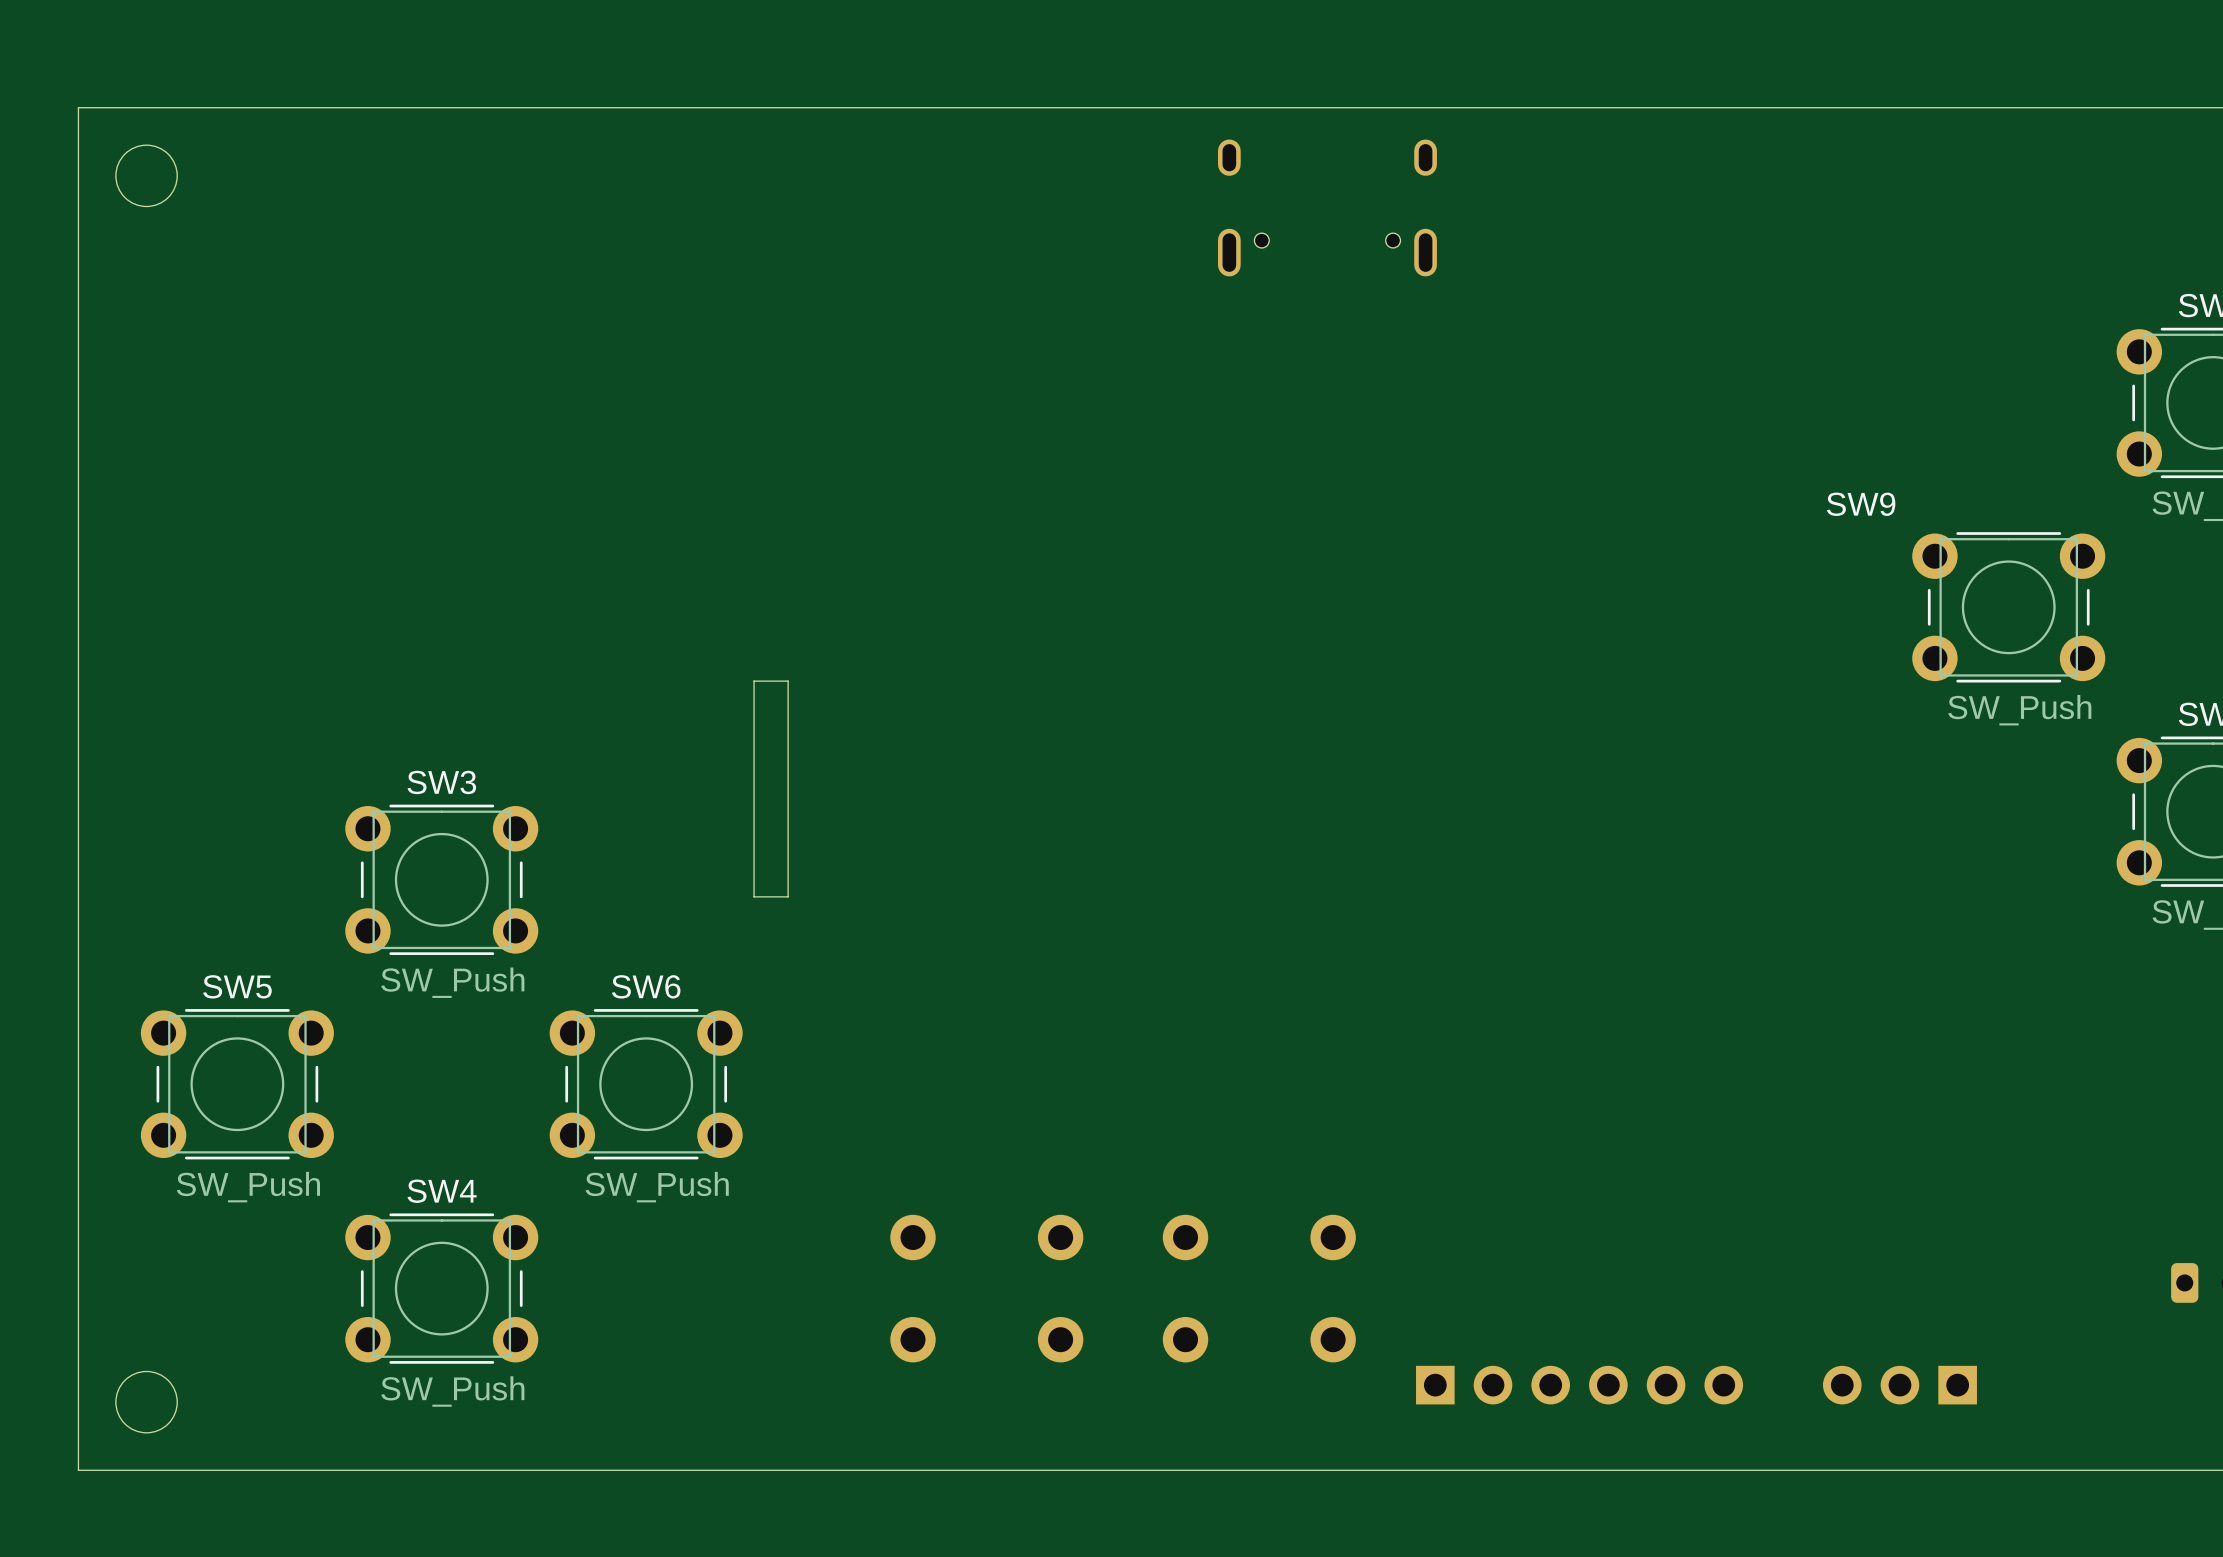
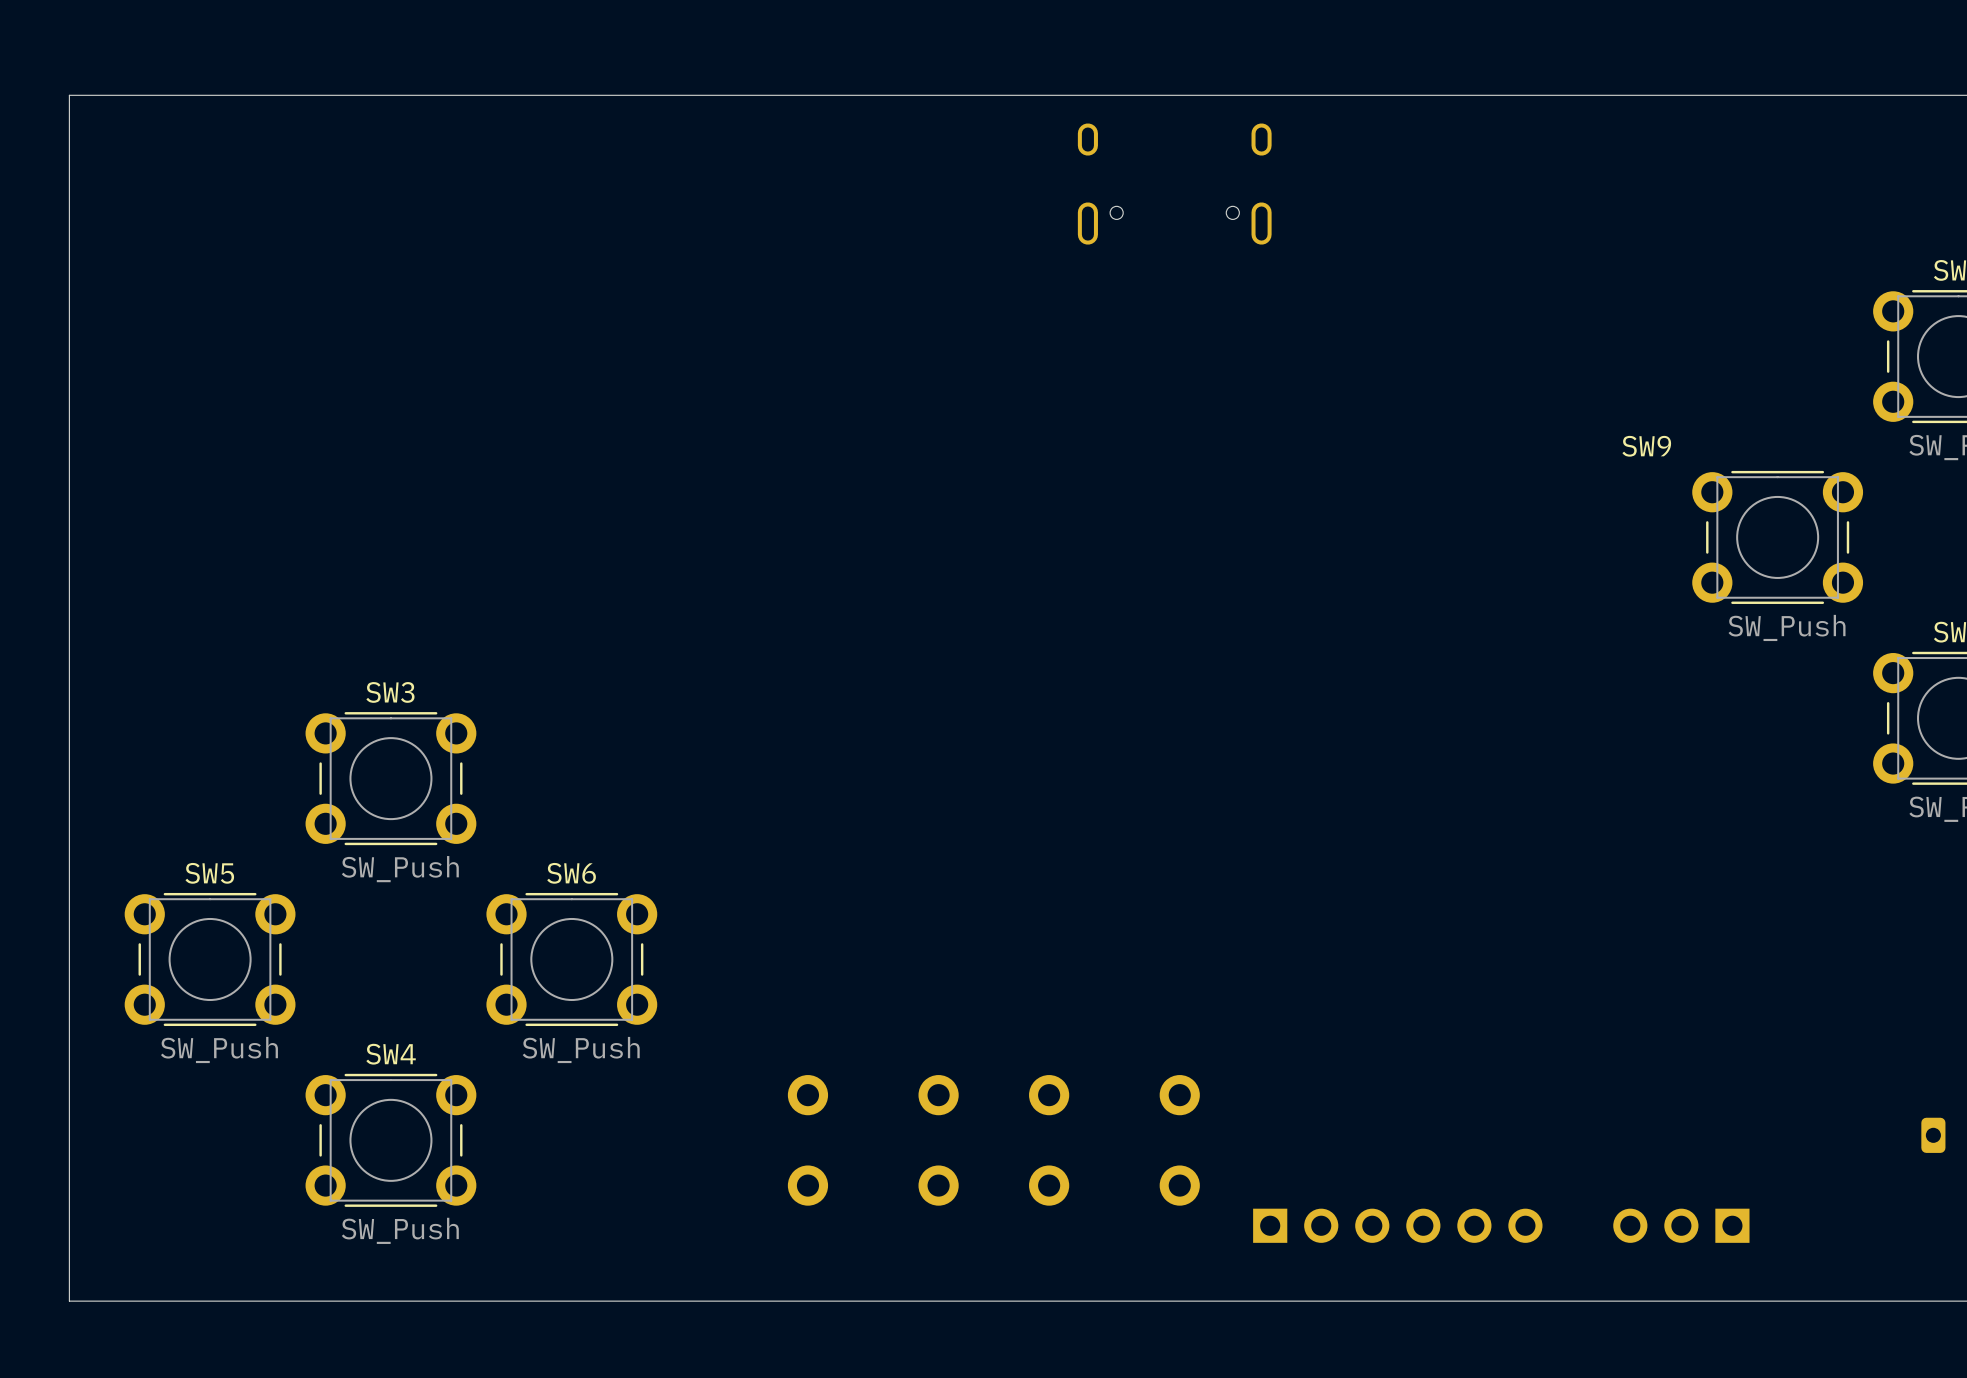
round board edge: [115, 144, 178, 208] -> none
board edge: (754, 681) (788, 681) (788, 896) (754, 896) (754, 681) -> none
round board edge: [115, 1370, 178, 1434] -> none

